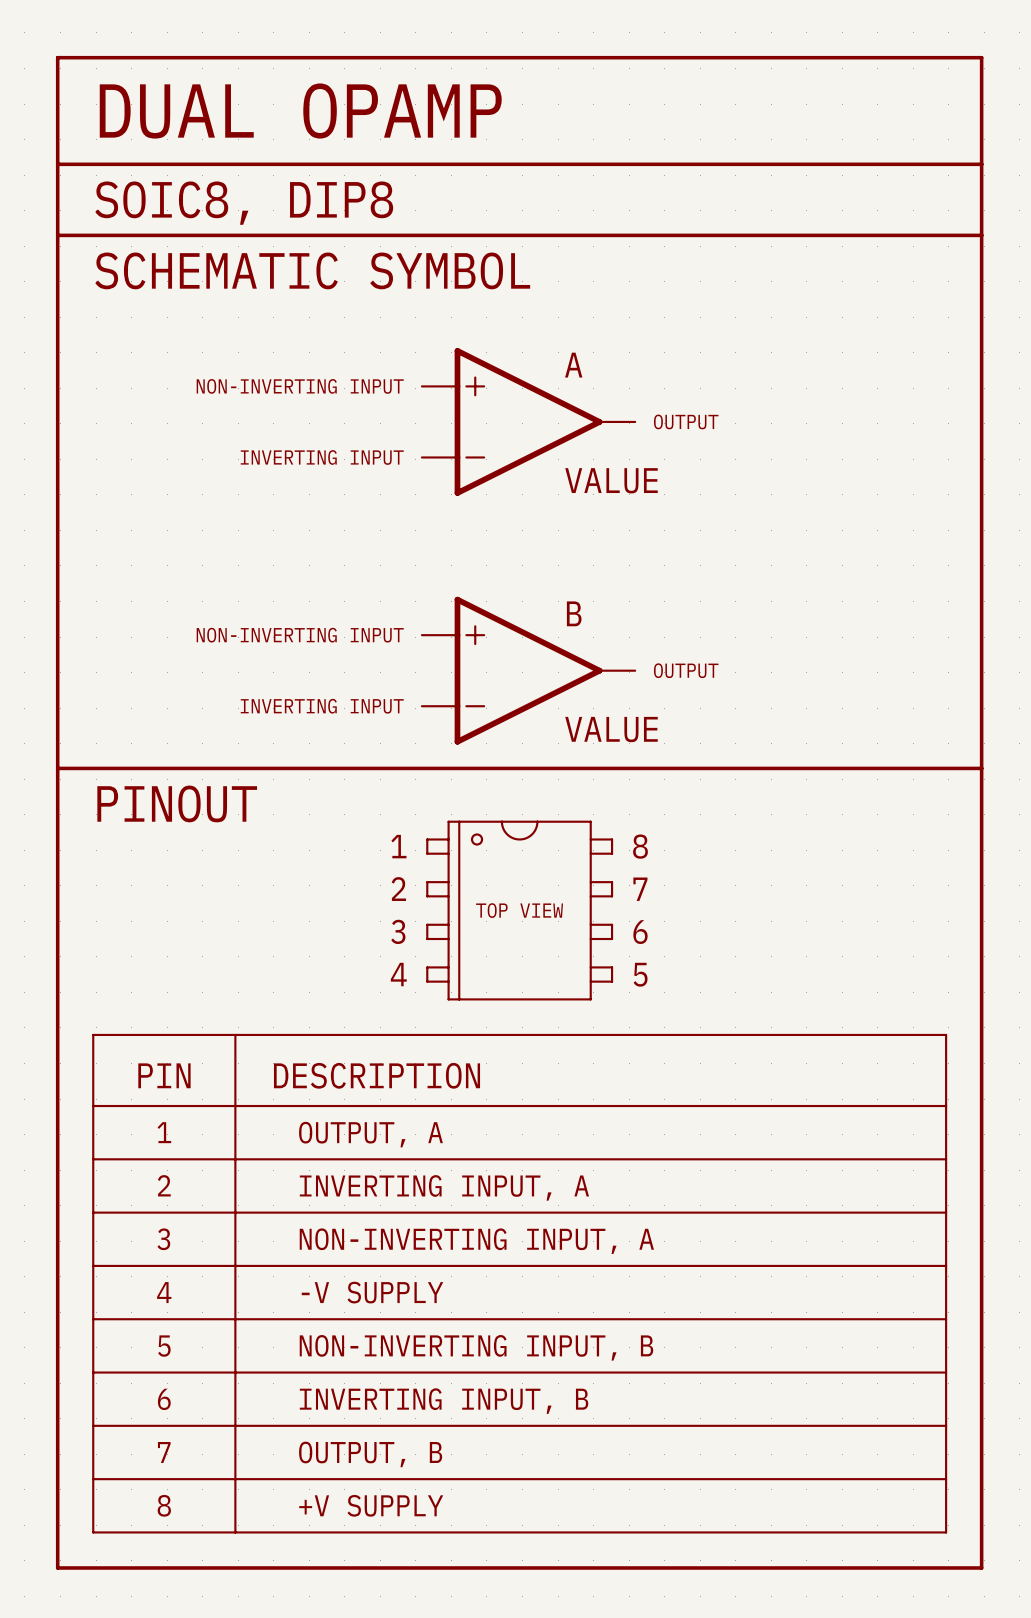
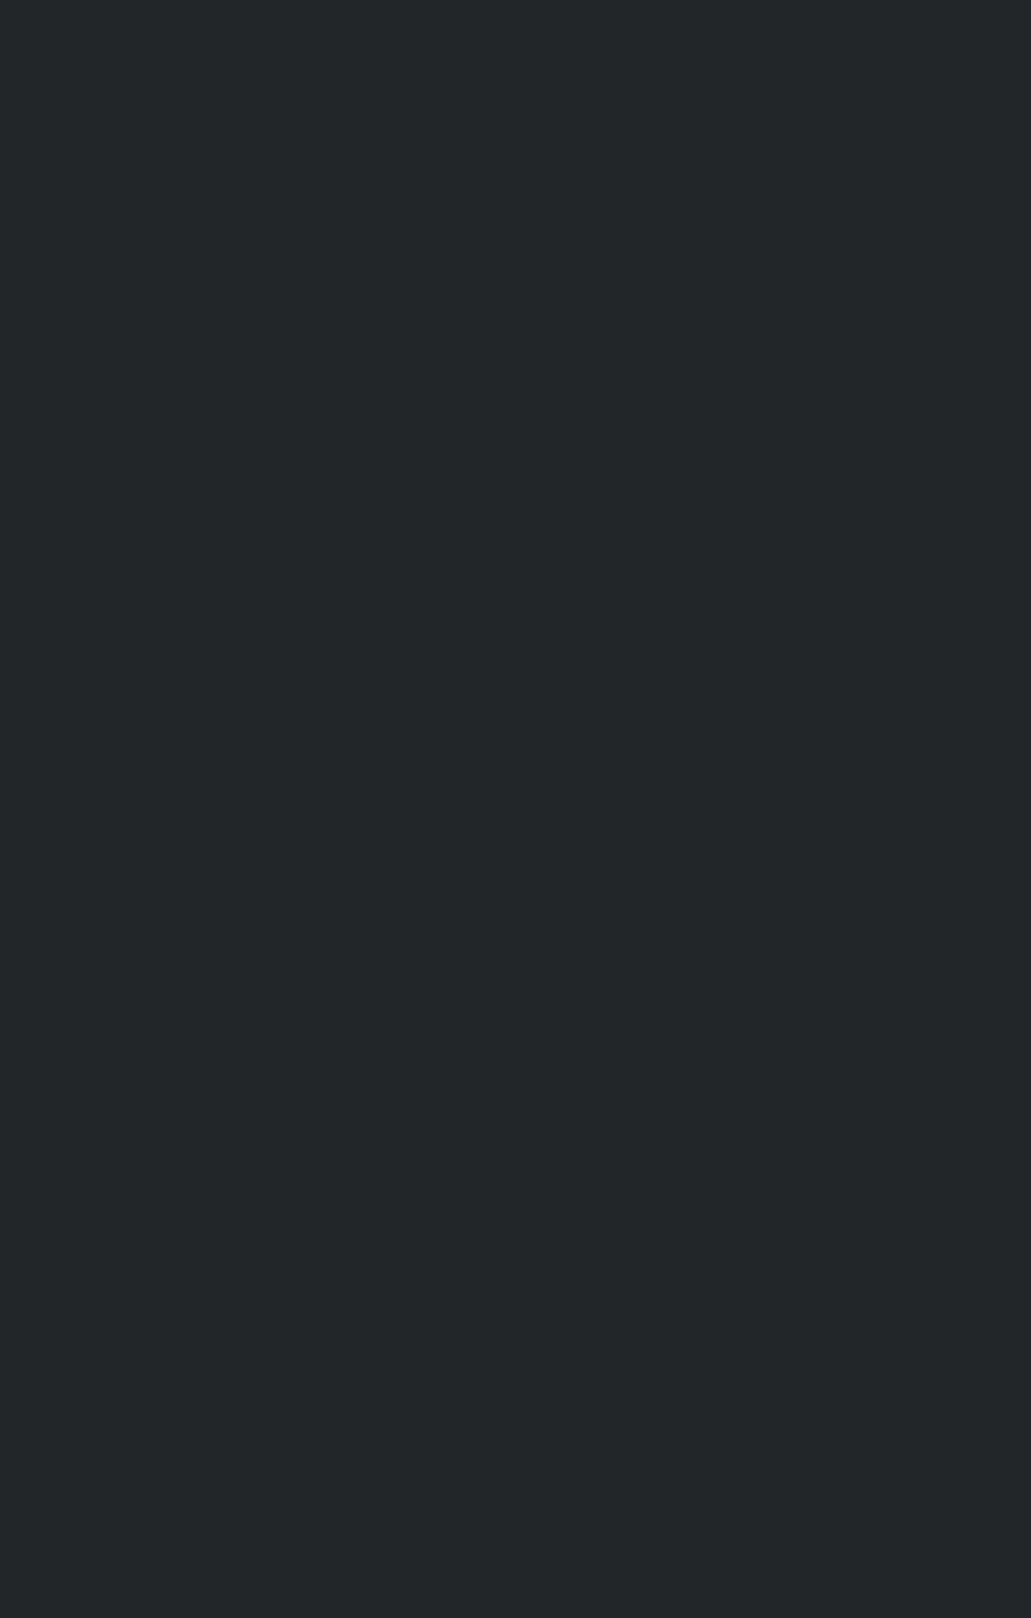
part: (519, 812) -> none

